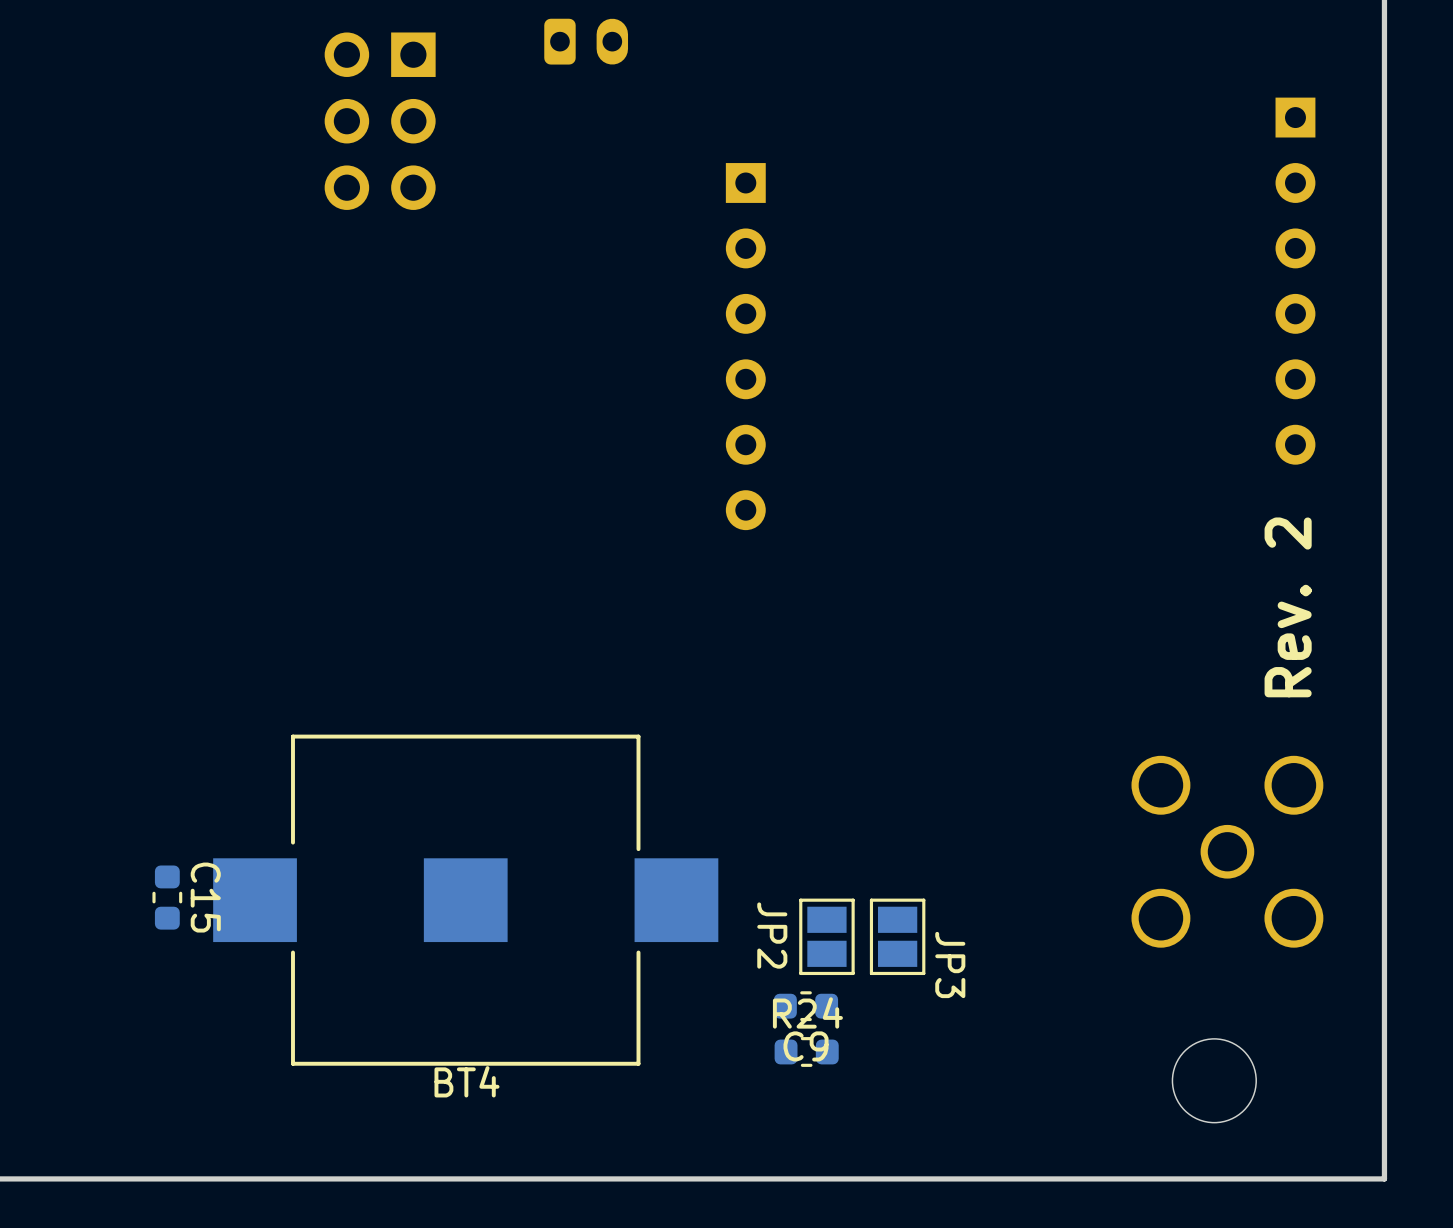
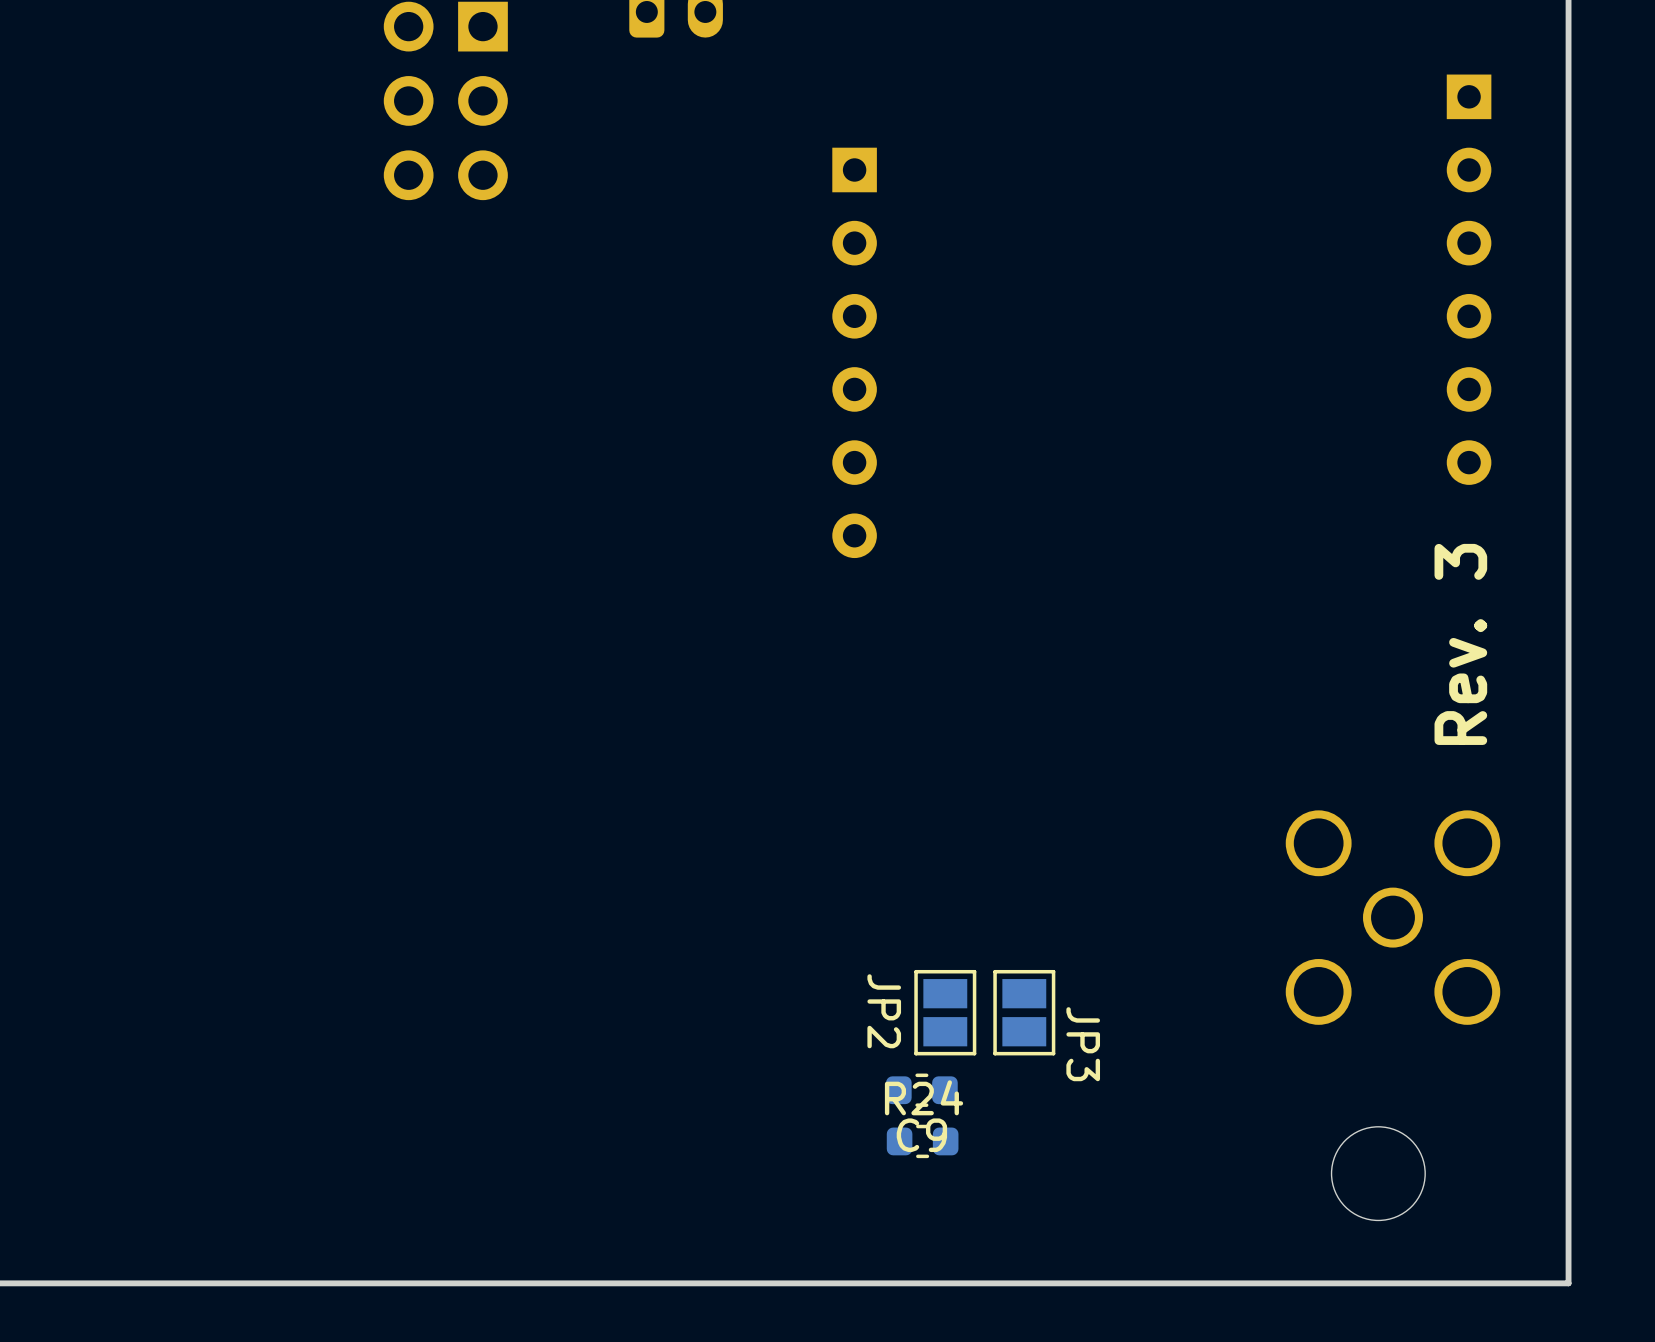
text: Rev. 2 (1288, 607) -> Rev. 3 (1460, 644)
C15: (167, 897) -> none
BT4: (465, 900) -> none

